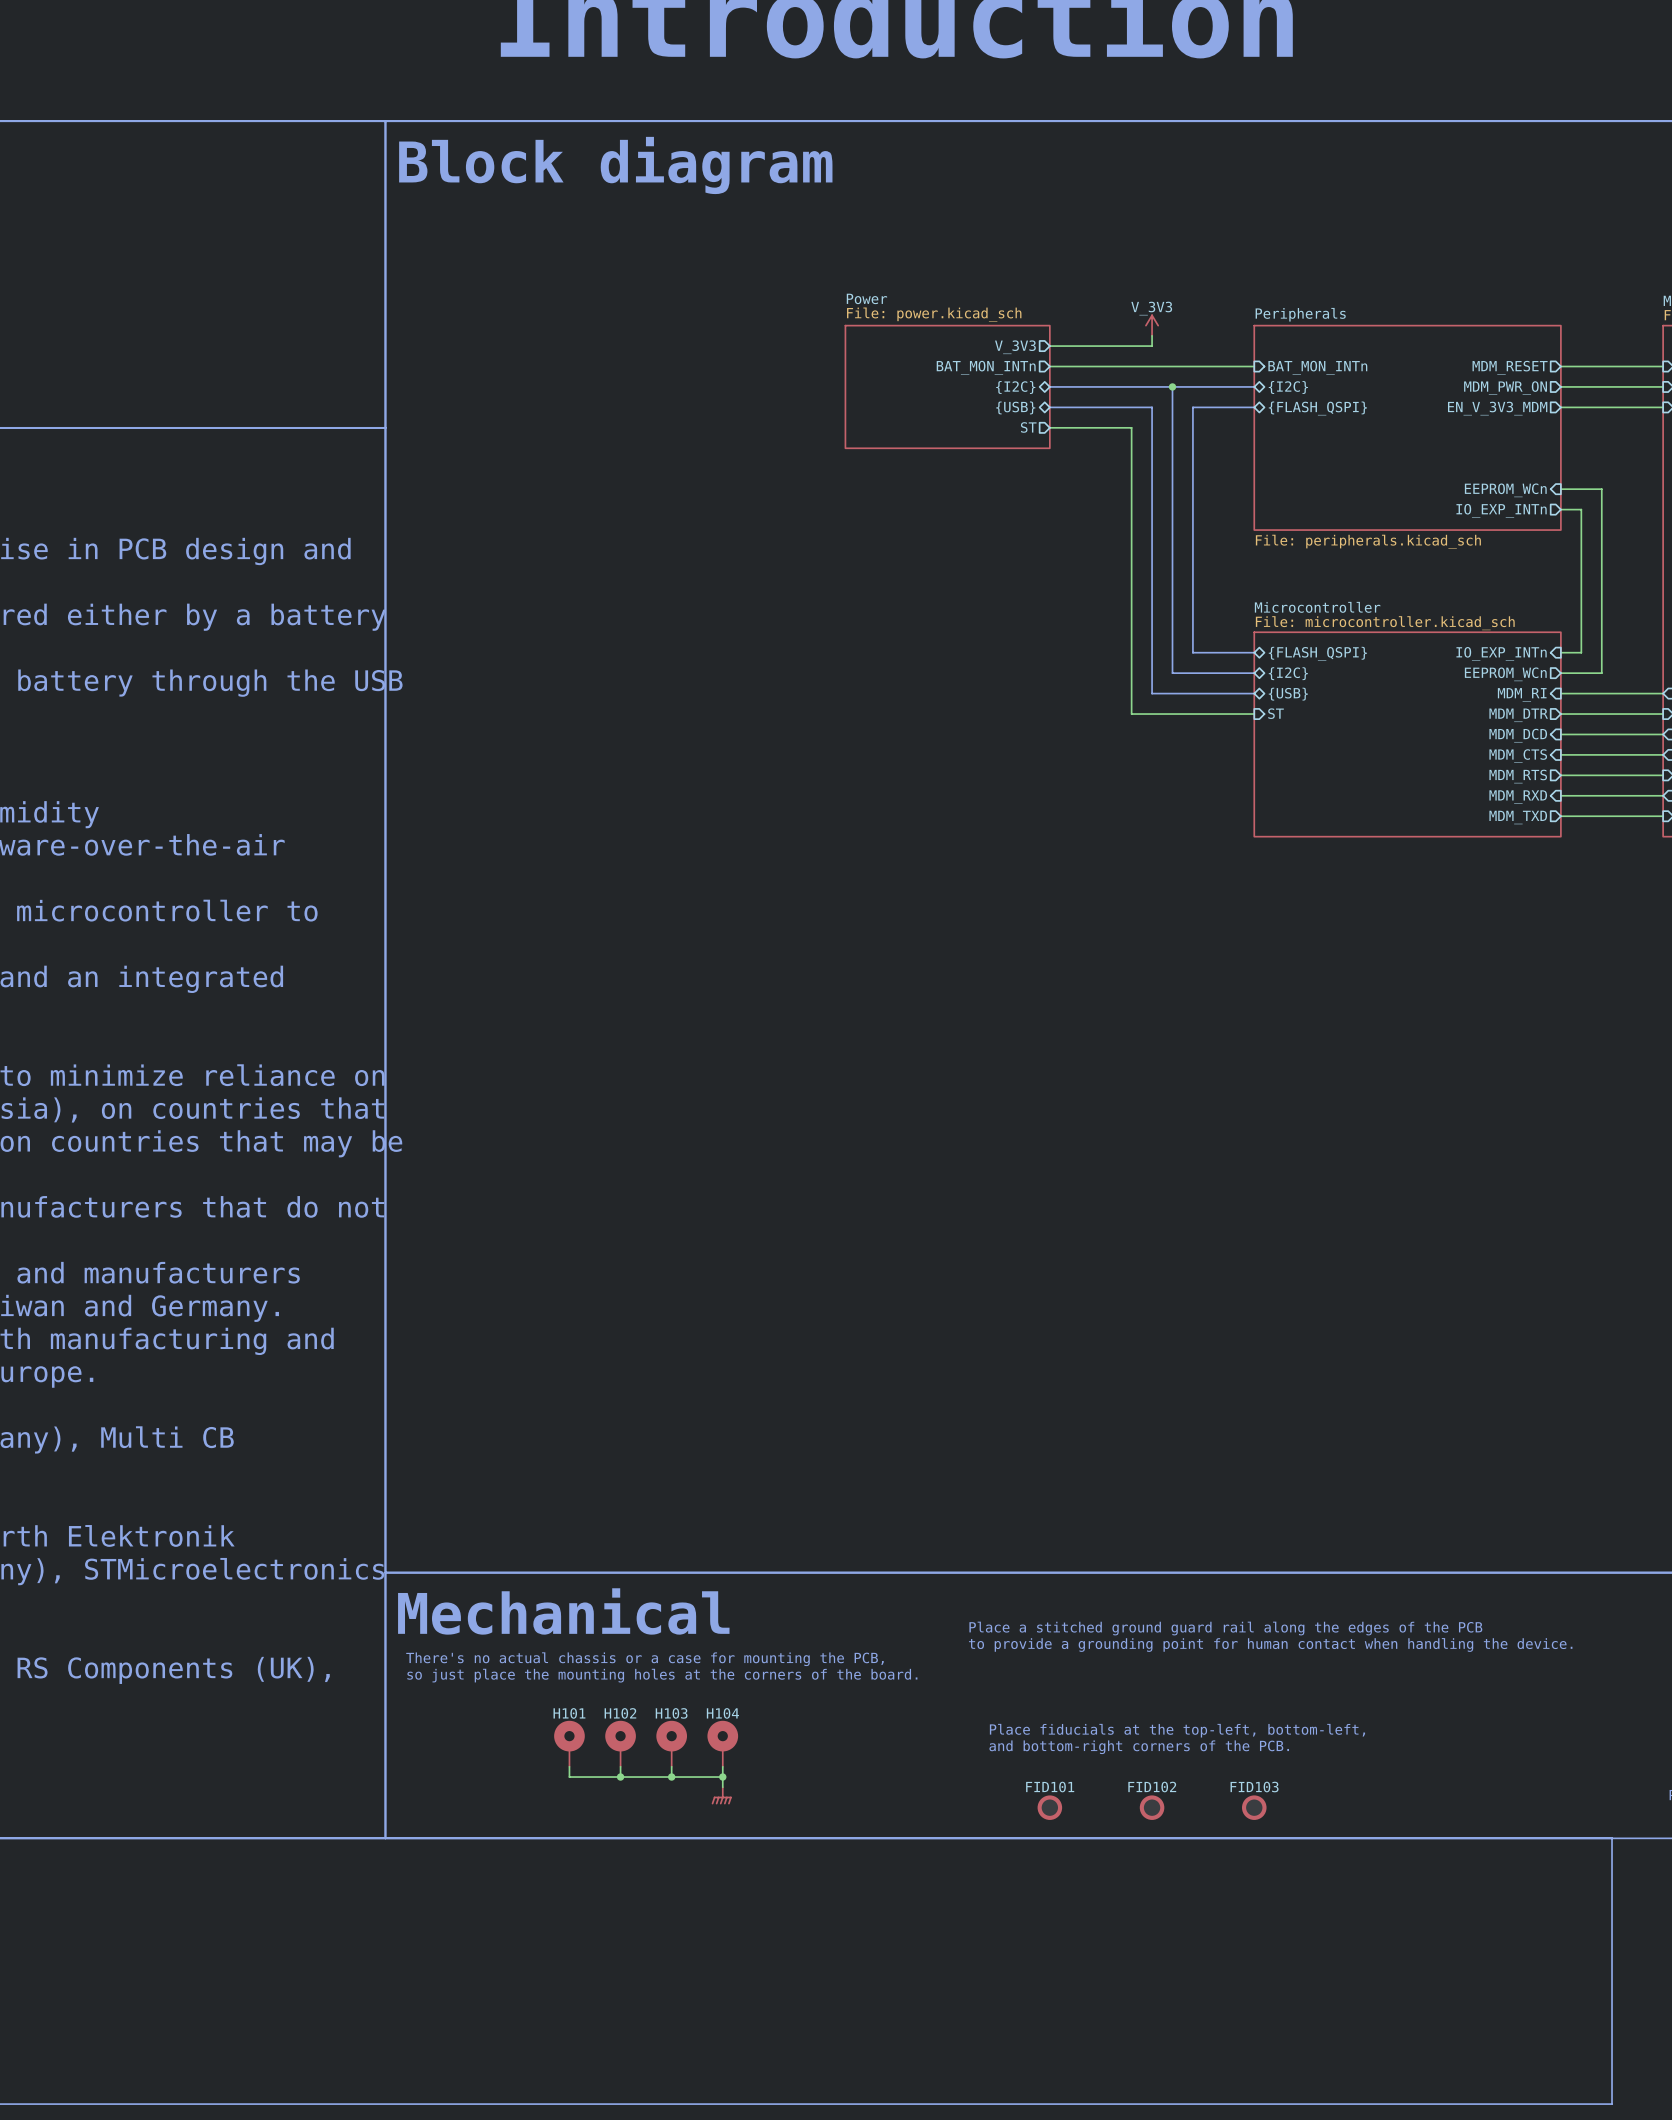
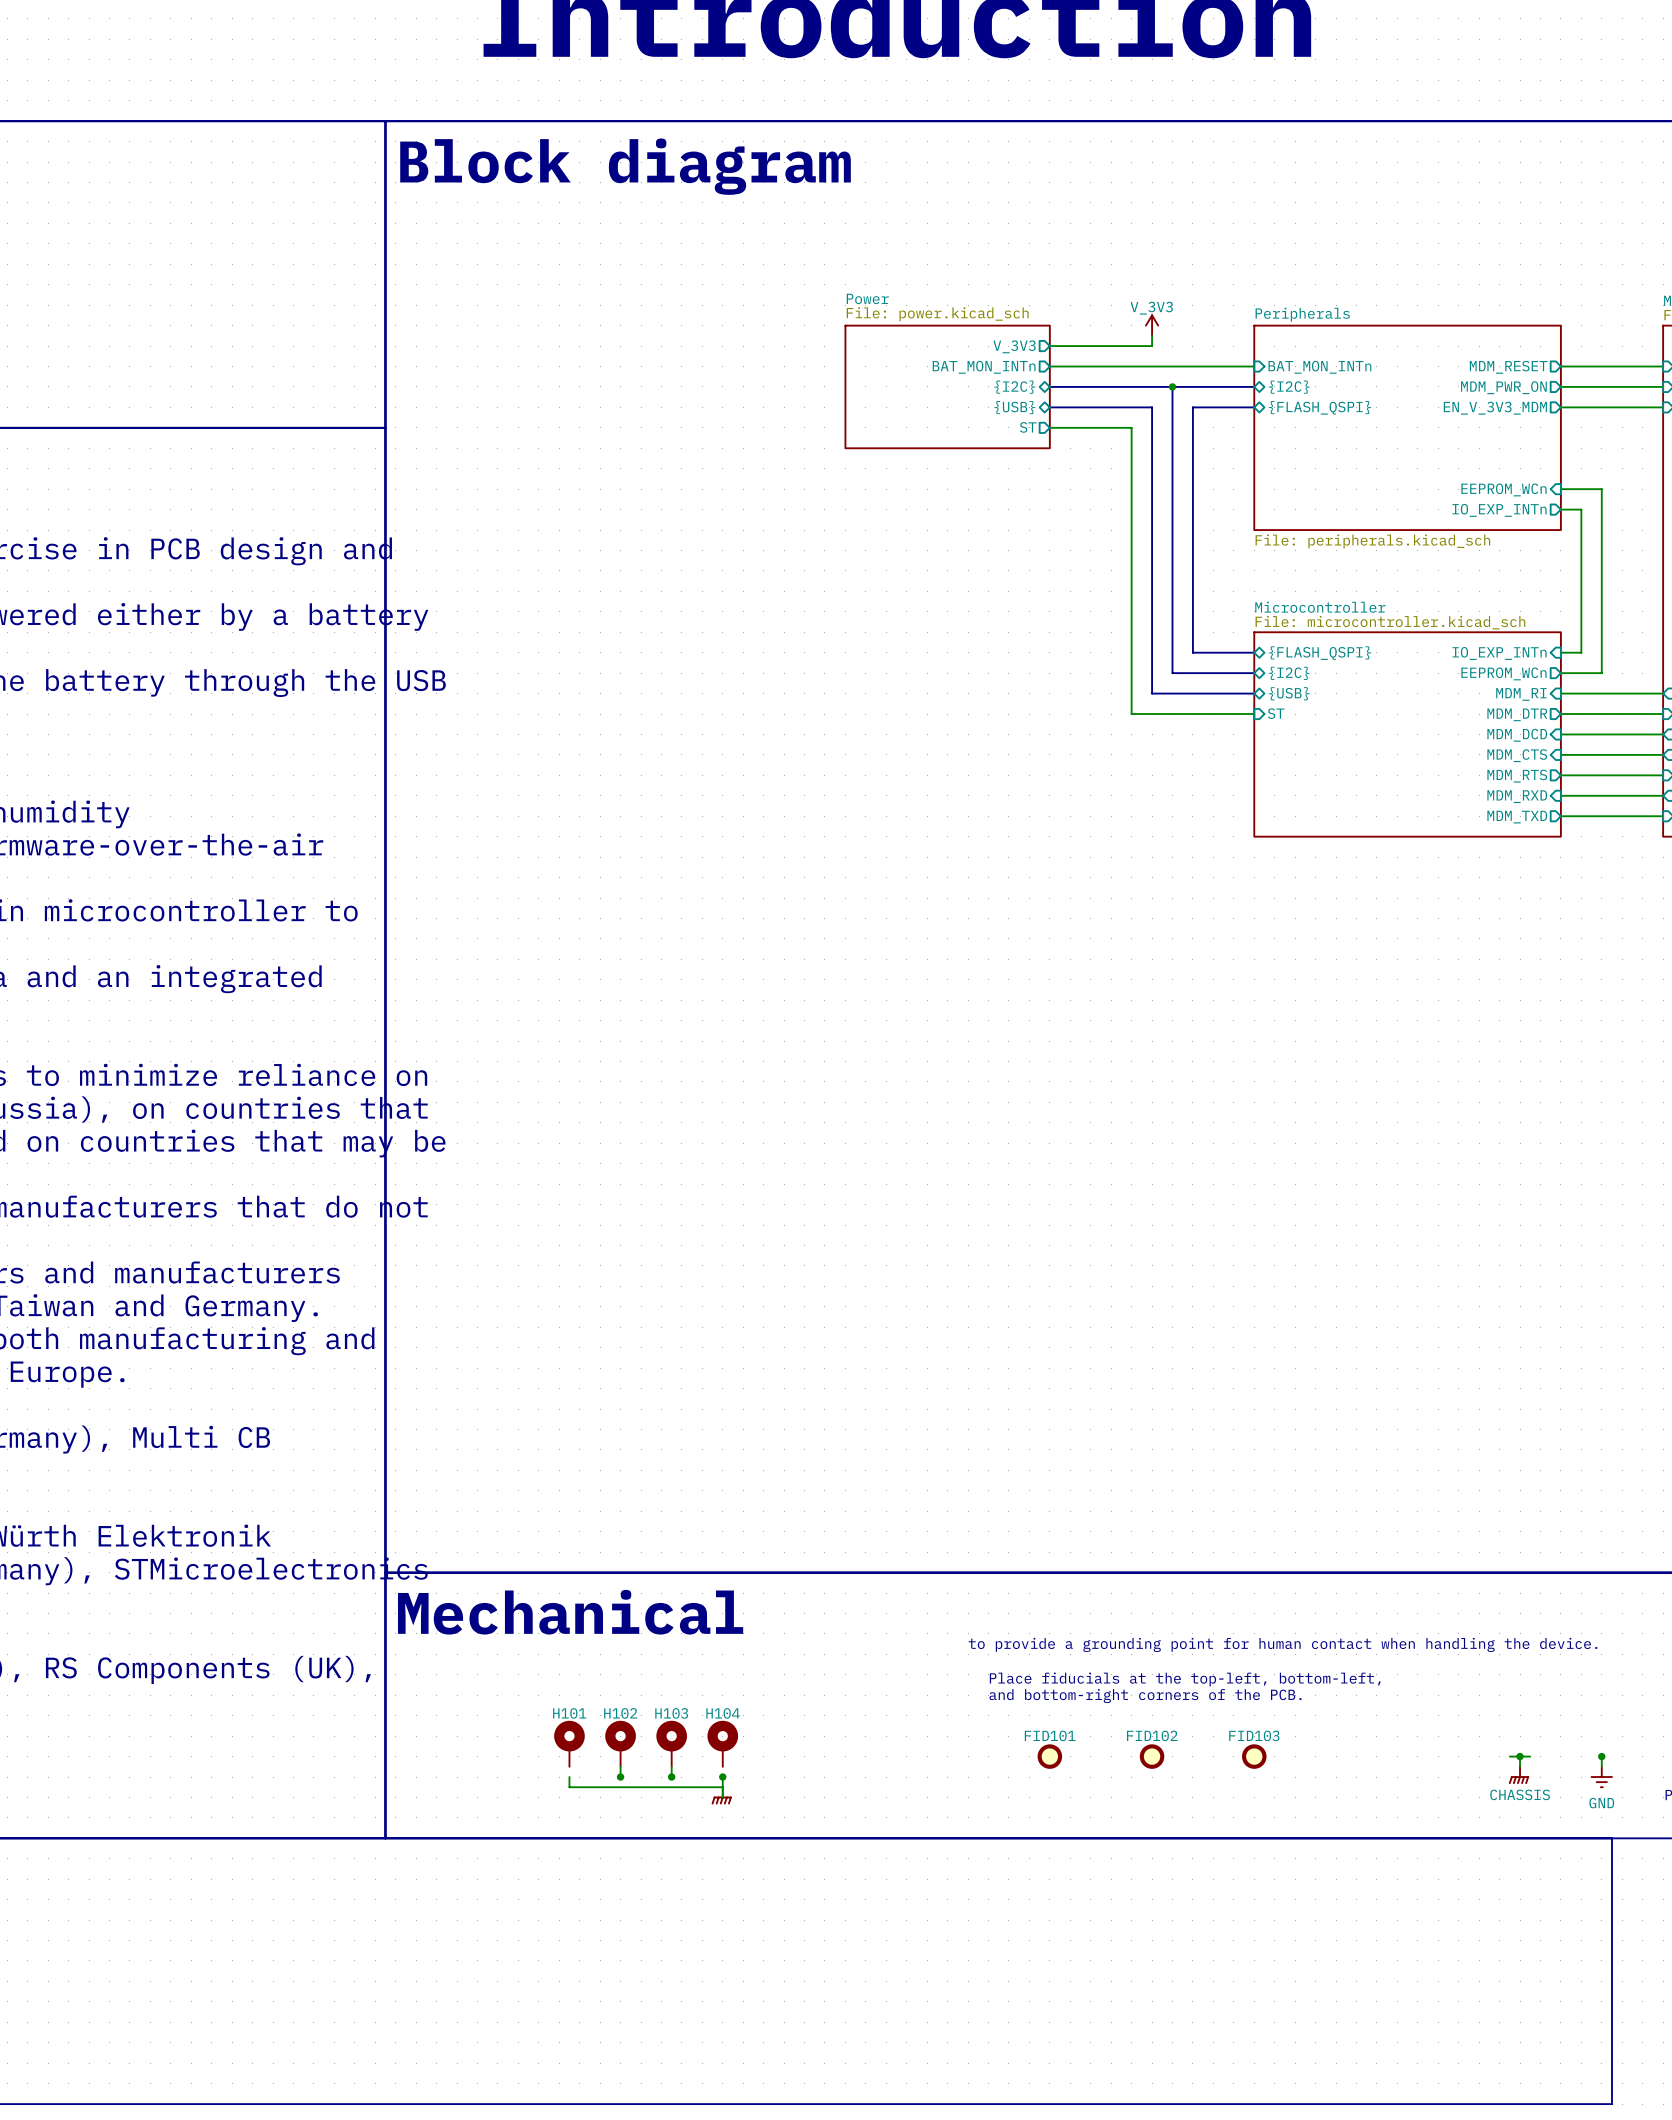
text: Place a stitched ground guard rail along the edges of the PCB (1225, 1628) -> none
text: There's no actual chassis or a case for mounting the PCB, (644, 1659) -> none
text: so just place the mounting holes at the corners of the board. (662, 1675) -> none
text position: Place fiducials at the top-left, bottom-left, (1177, 1730) -> Place fiducials at the top-left, bottom-left, (1185, 1679)
text position: and bottom-right corners of the PCB. (1139, 1747) -> and bottom-right corners of the PCB. (1145, 1696)
wire: none -> (1509, 1756) (1530, 1756)
wire: none -> (1520, 1756) (1520, 1766)
junction: none -> (1520, 1756)
wire: none -> (1601, 1756) (1601, 1766)
junction: none -> (1601, 1756)
wire: (569, 1766) (569, 1777) (722, 1777) (722, 1766) -> none
power symbol: none -> CHASSIS (1518, 1775)
wire: none -> (569, 1777) (569, 1787) (722, 1787) (722, 1797)
power symbol: none -> GND (1601, 1777)
FID101 position: (1049, 1807) -> (1049, 1756)
FID102 position: (1152, 1807) -> (1152, 1756)
FID103 position: (1254, 1807) -> (1254, 1756)

